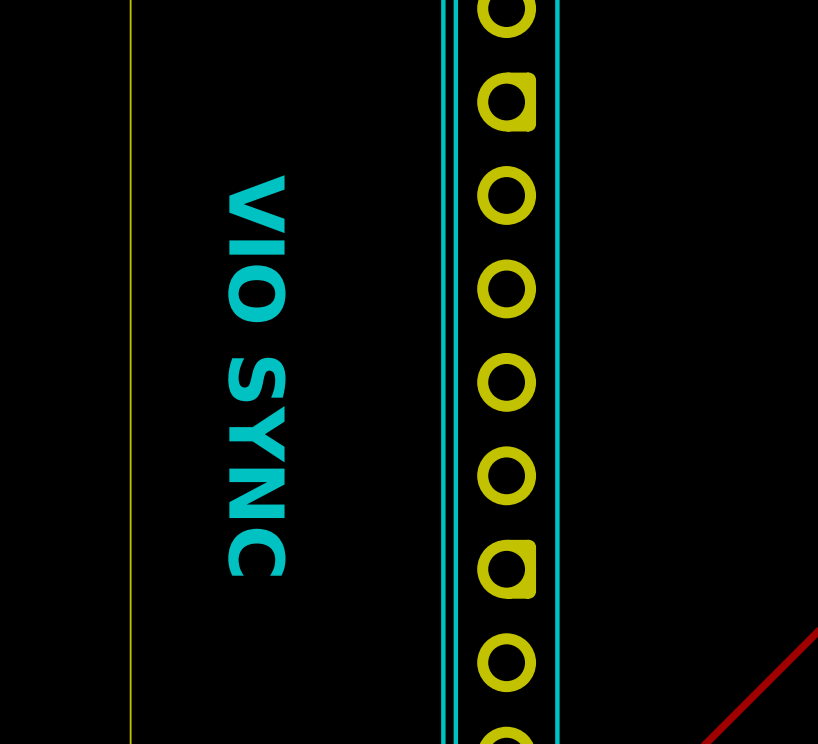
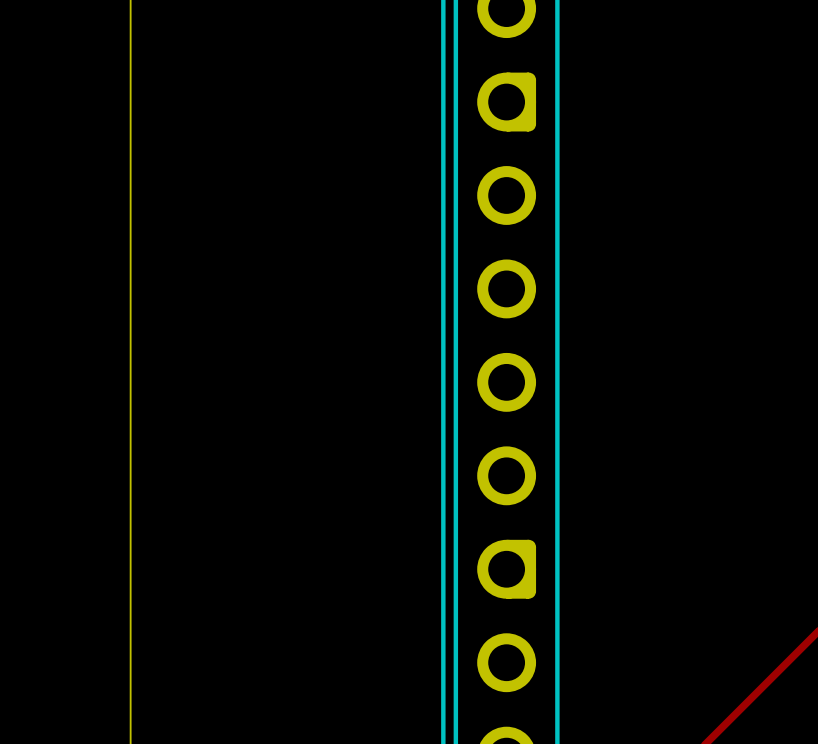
text: VIO SYNC (256, 375) -> none

